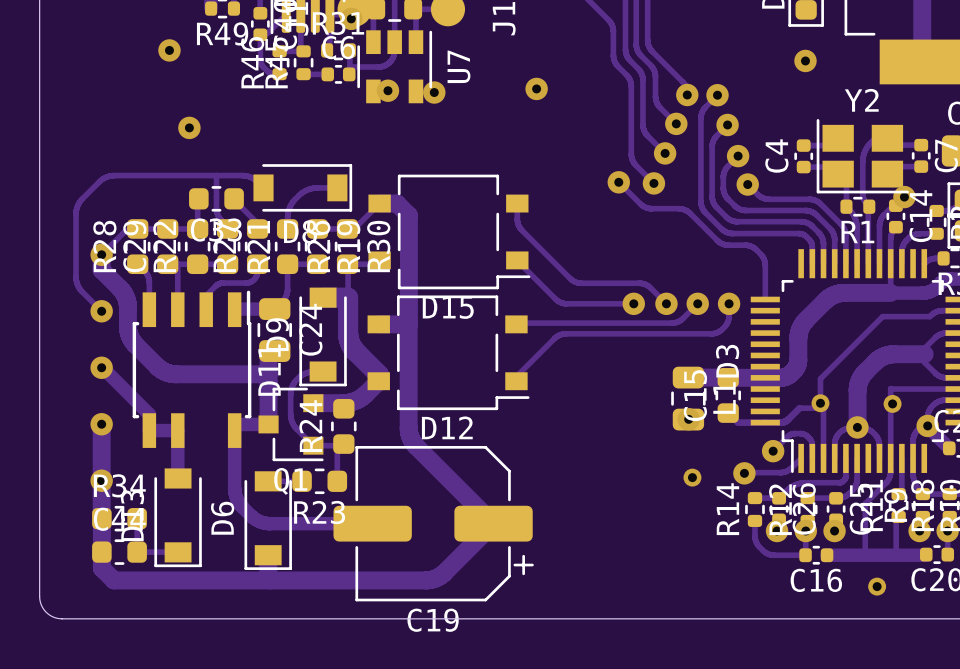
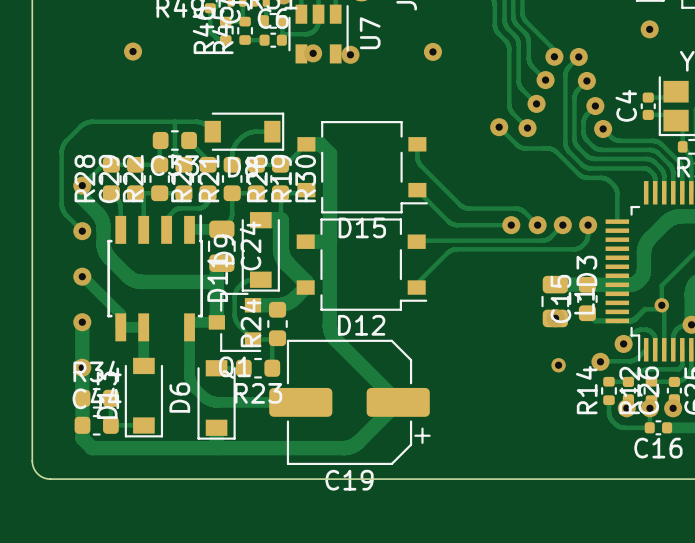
via: (169, 50) -> none
via: none -> (133, 51)
via: (189, 127) -> none

